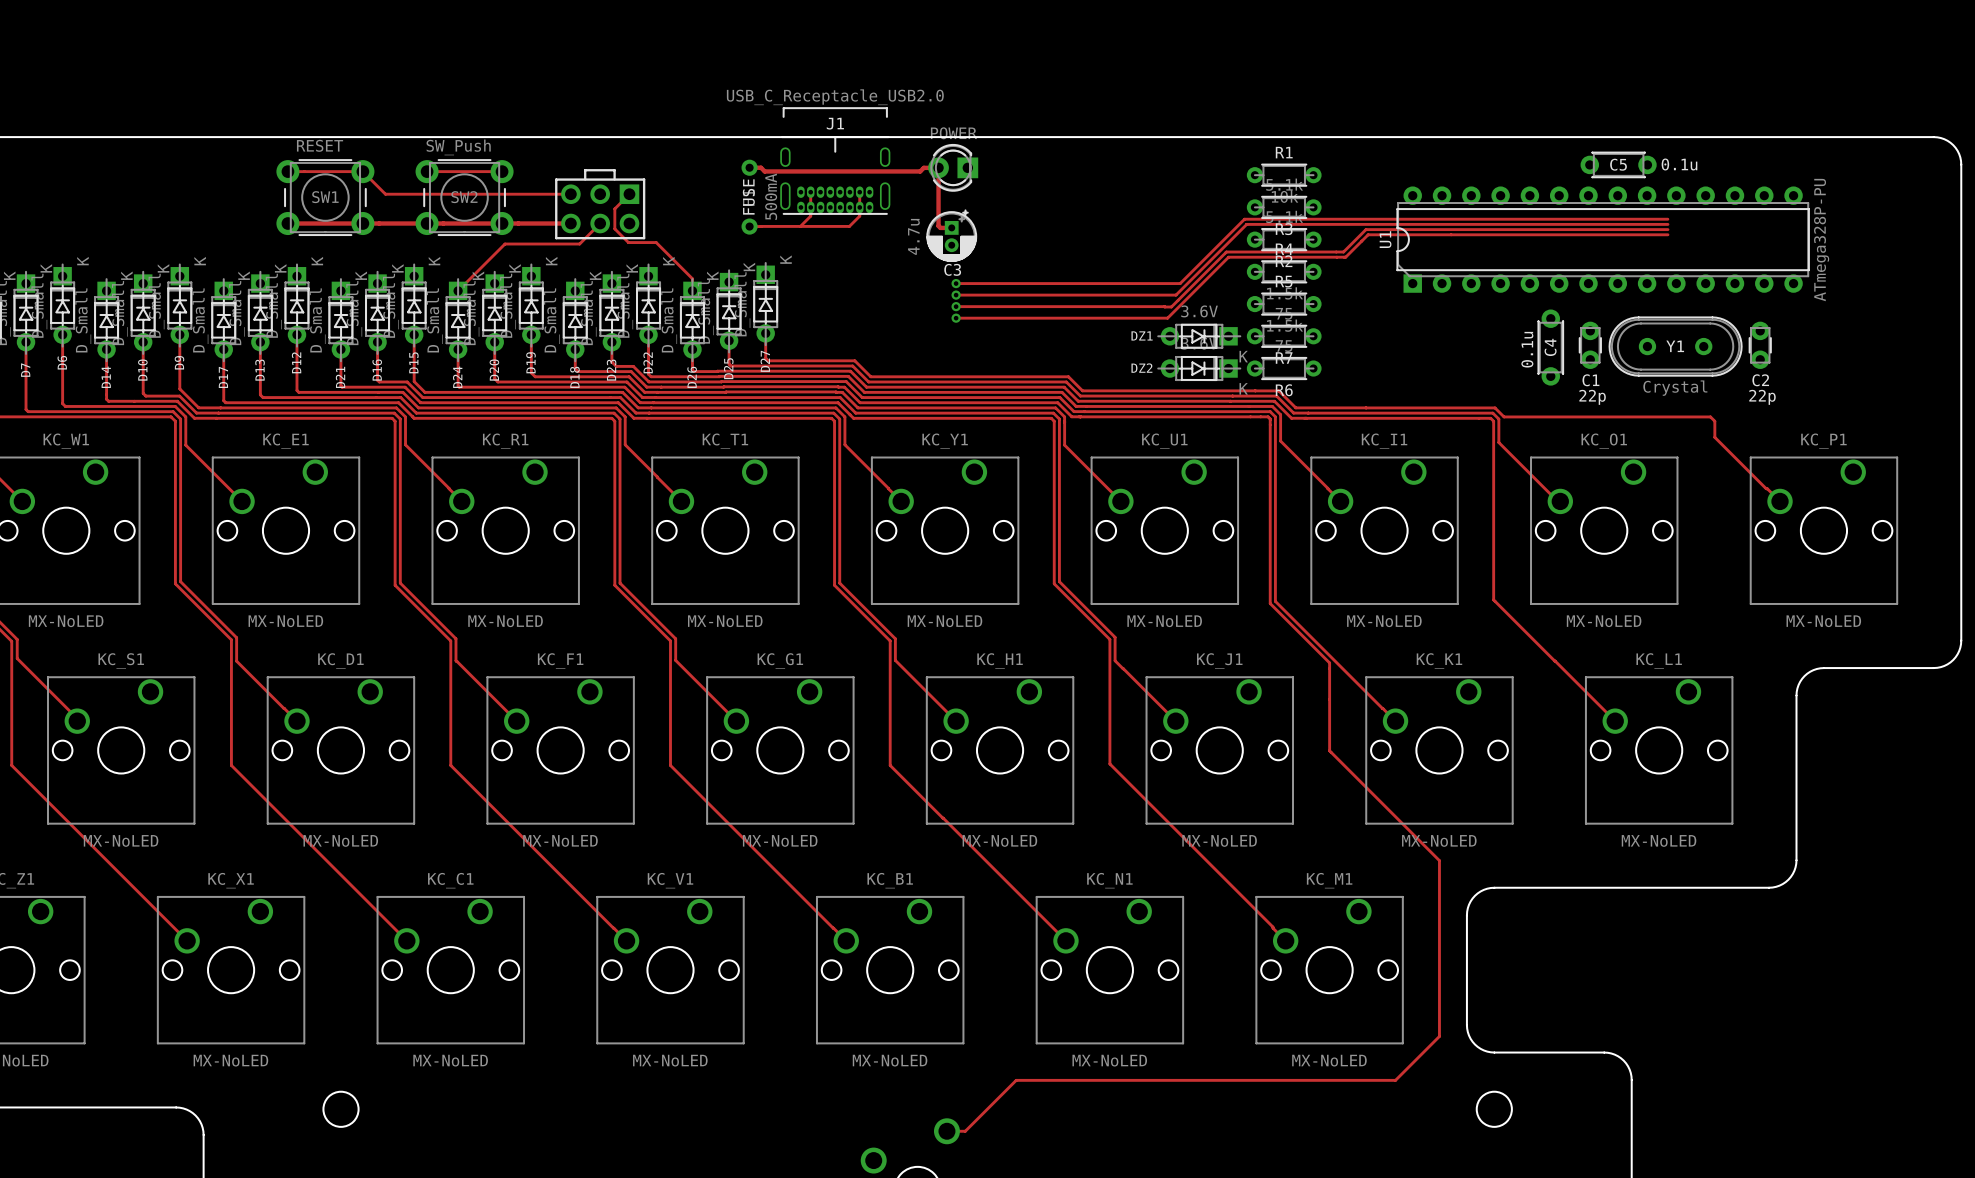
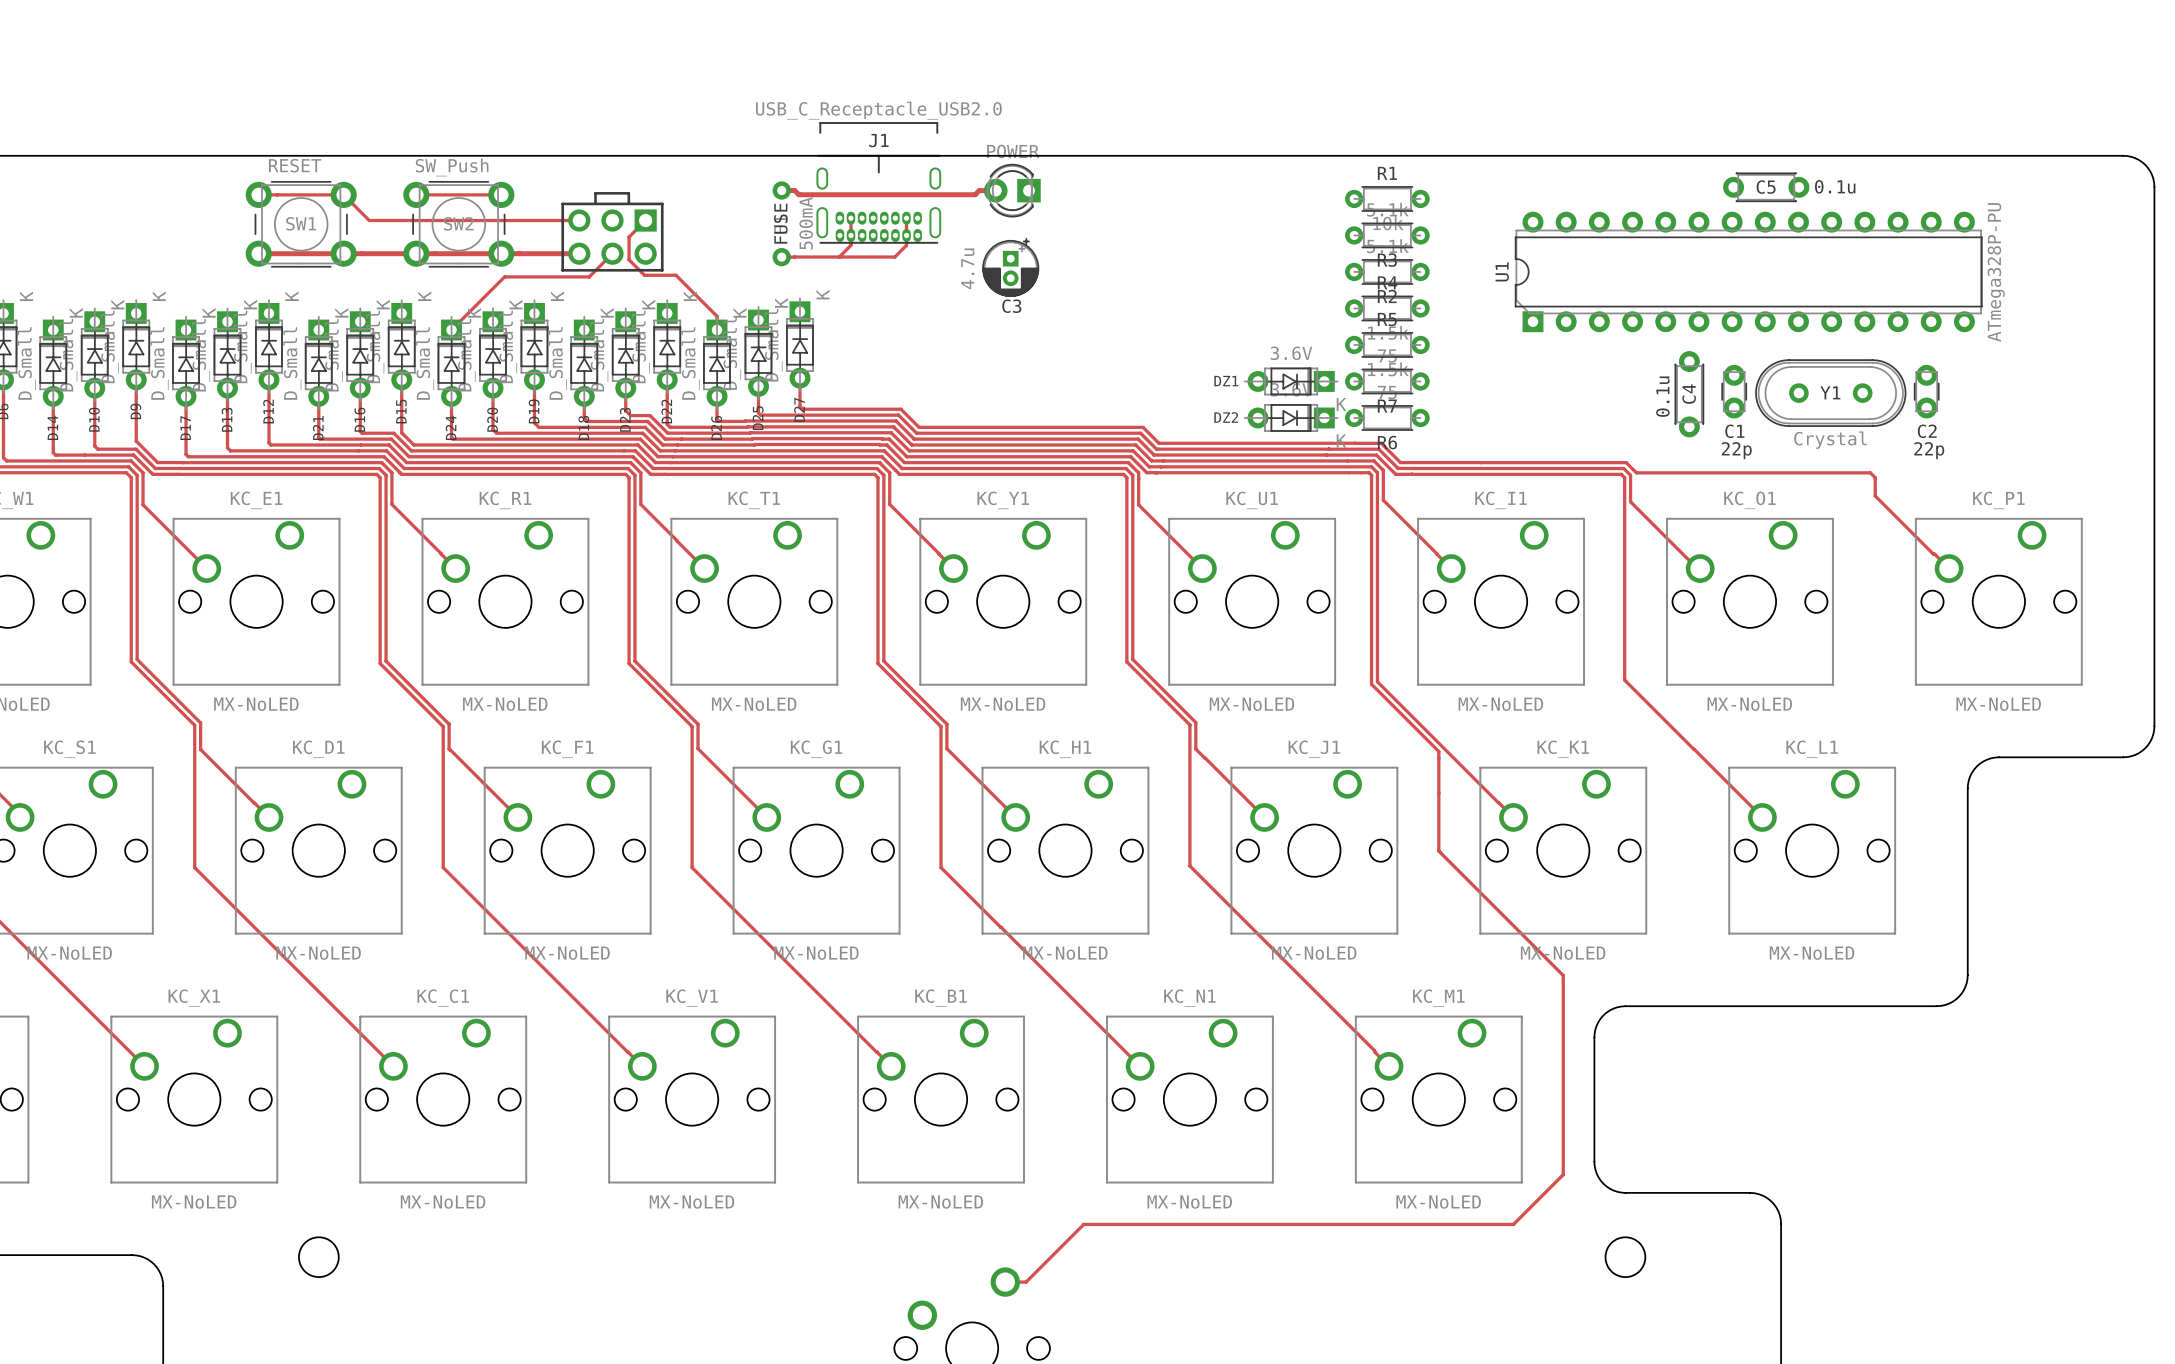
track: (938, 167) (938, 226) (940, 227) (951, 227) -> none
track: (1667, 219) (1244, 219) (1180, 283) (956, 283) -> none
track: (1667, 224) (1246, 224) (1176, 295) (956, 295) -> none
track: (1667, 229) (1365, 229) (1343, 252) (1226, 252) (1171, 307) (956, 306) -> none
track: (1667, 234) (1368, 234) (1345, 257) (1228, 257) (1167, 318) (956, 318) -> none
via: (956, 283) -> none
via: (956, 295) -> none
via: (956, 306) -> none
via: (956, 318) -> none

